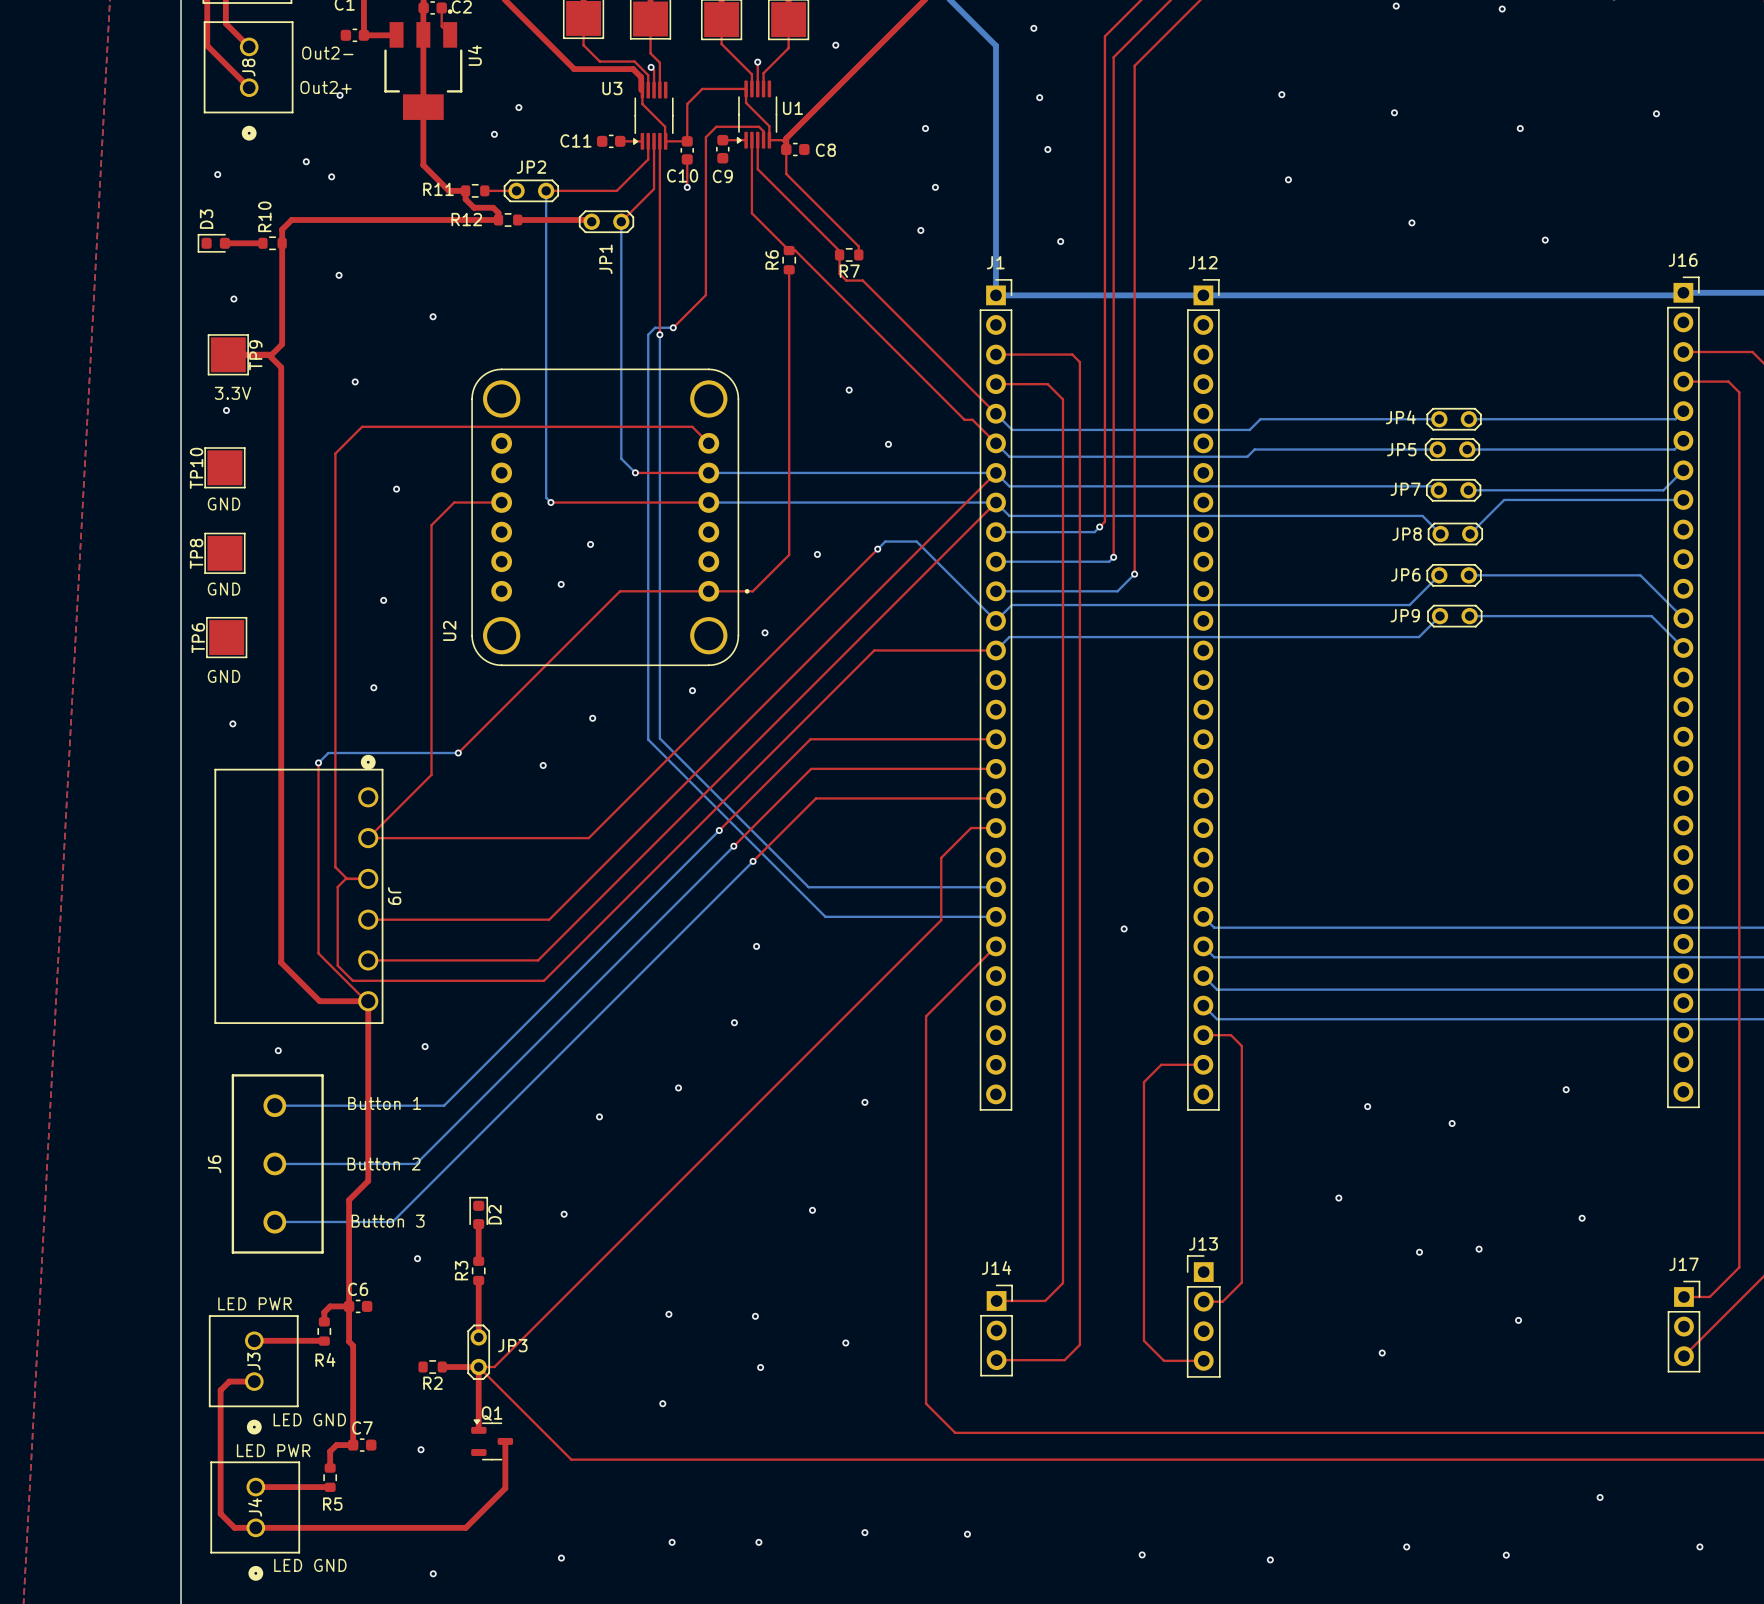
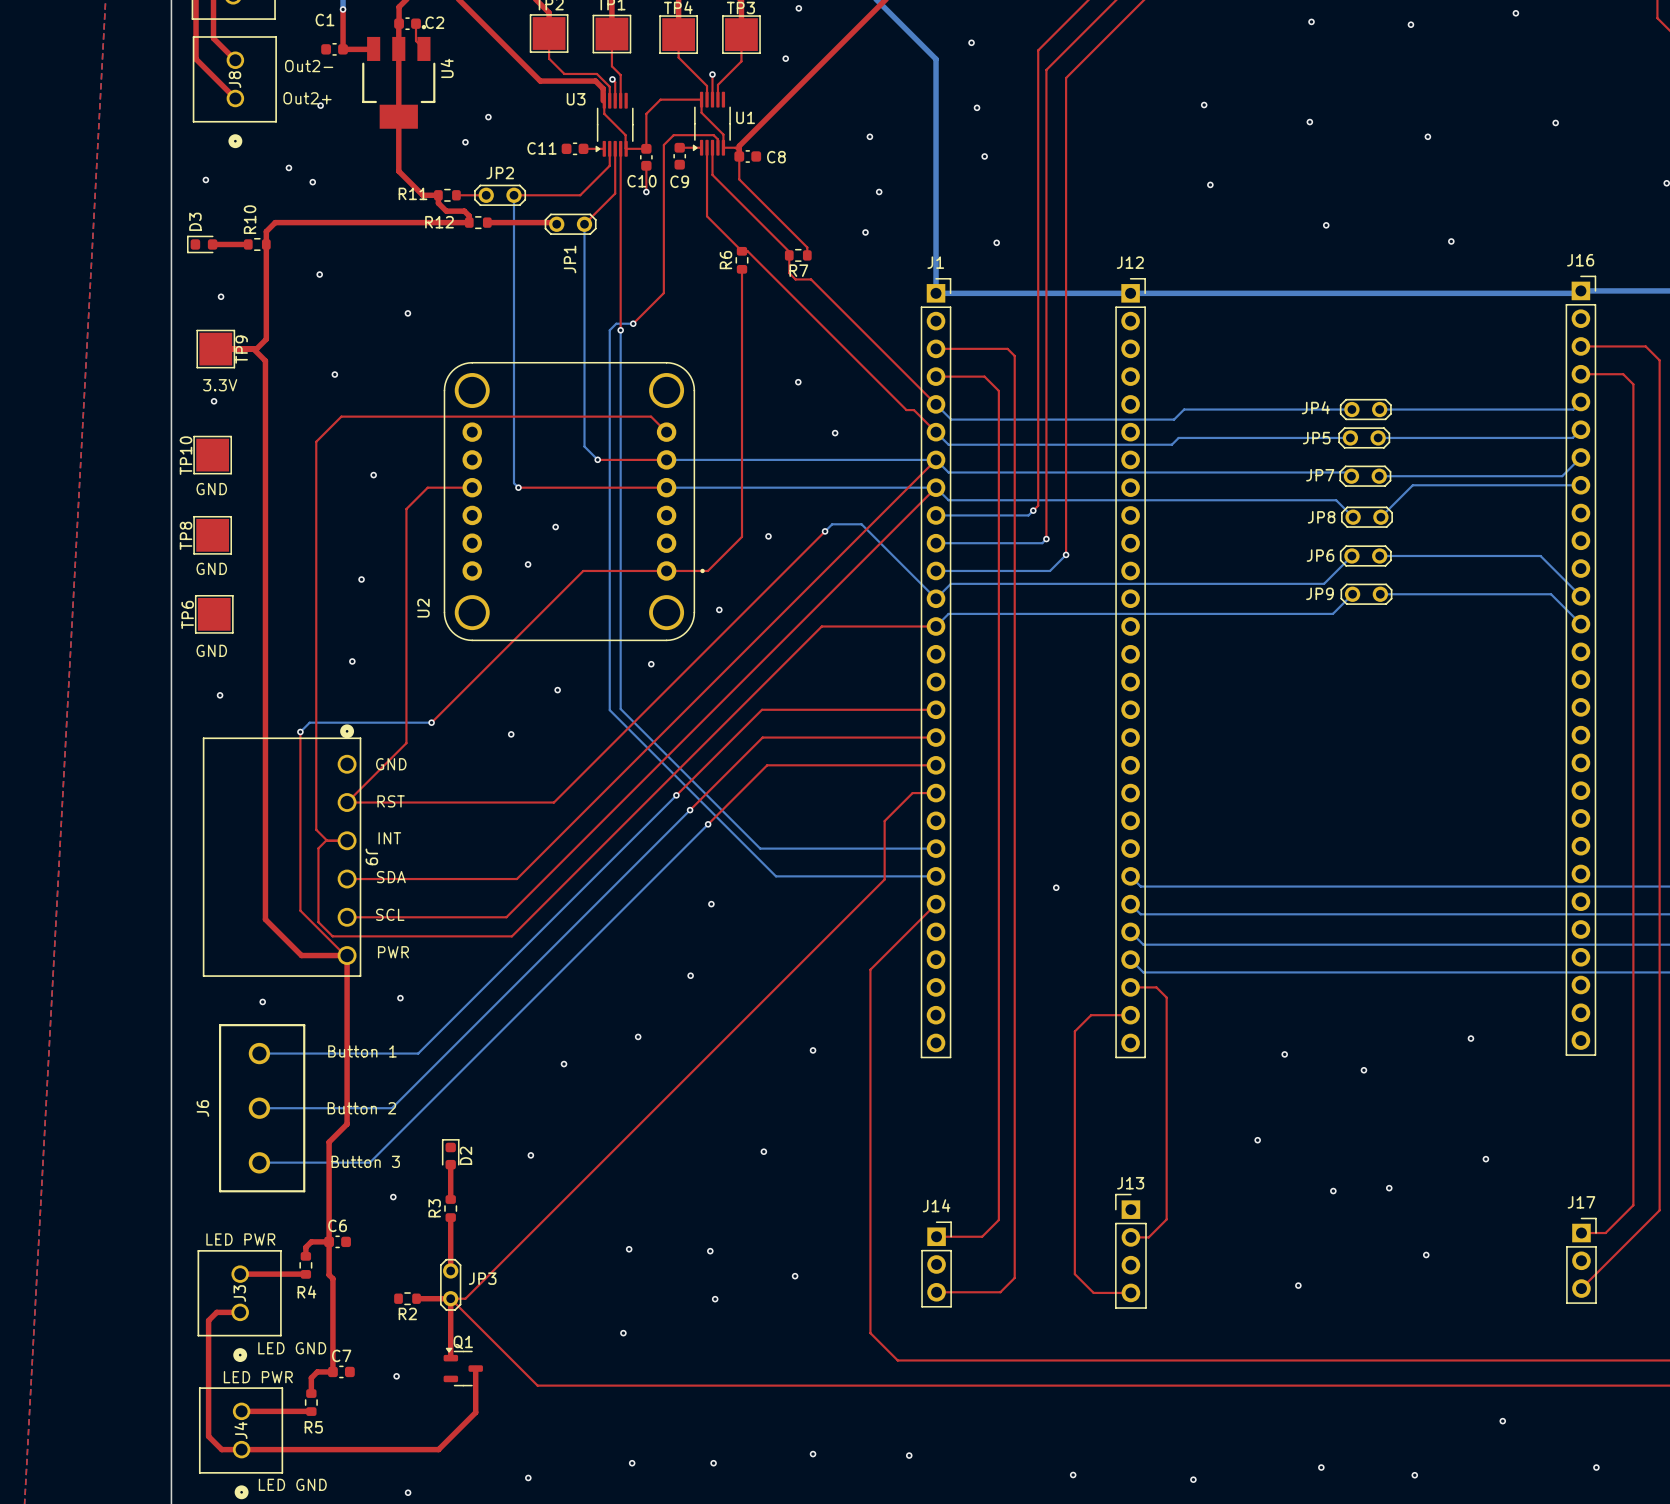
text: none -> GND (391, 764)
text: none -> RST (391, 801)
text: none -> INT (389, 838)
text: none -> SDA (391, 877)
text: none -> SCL (390, 914)
text: none -> PWR (393, 952)

